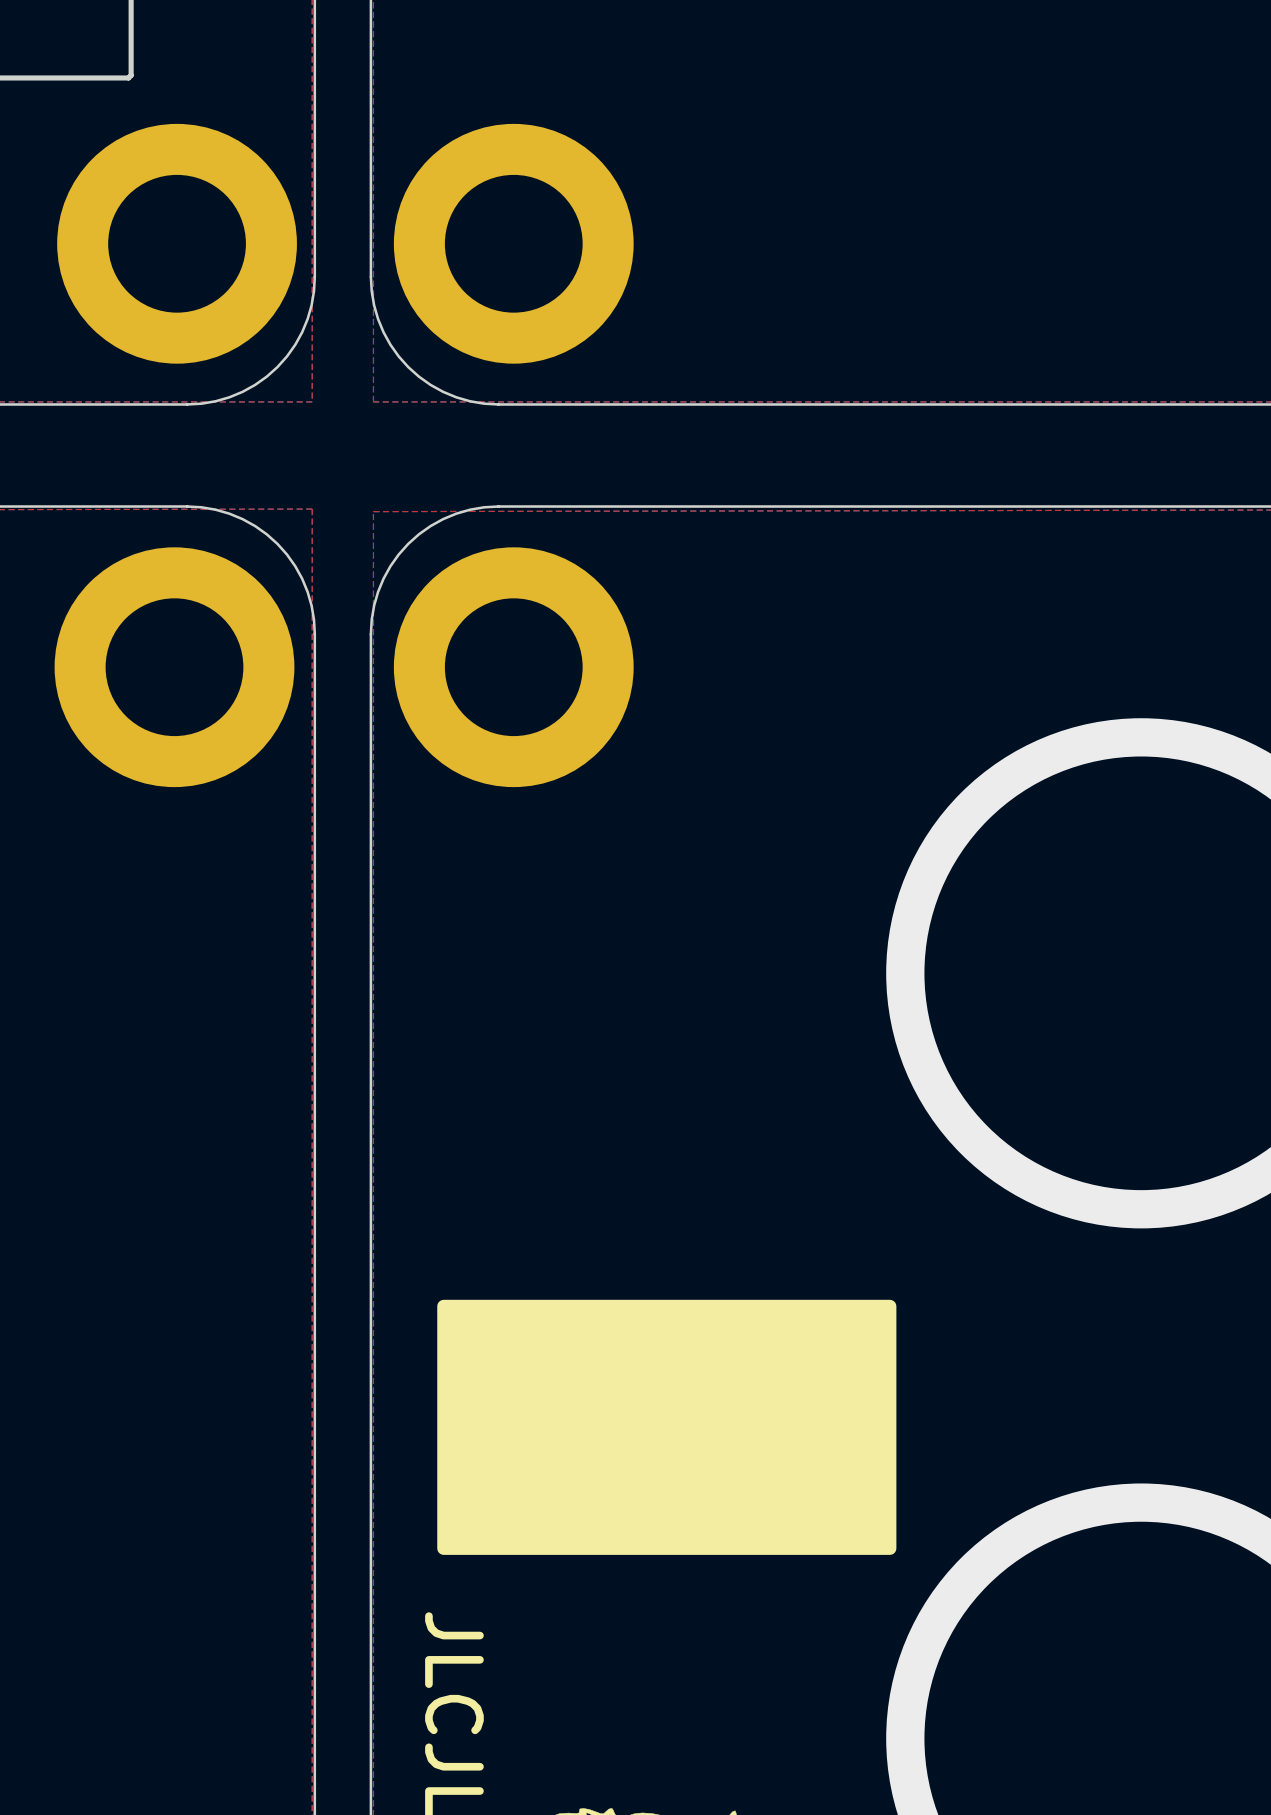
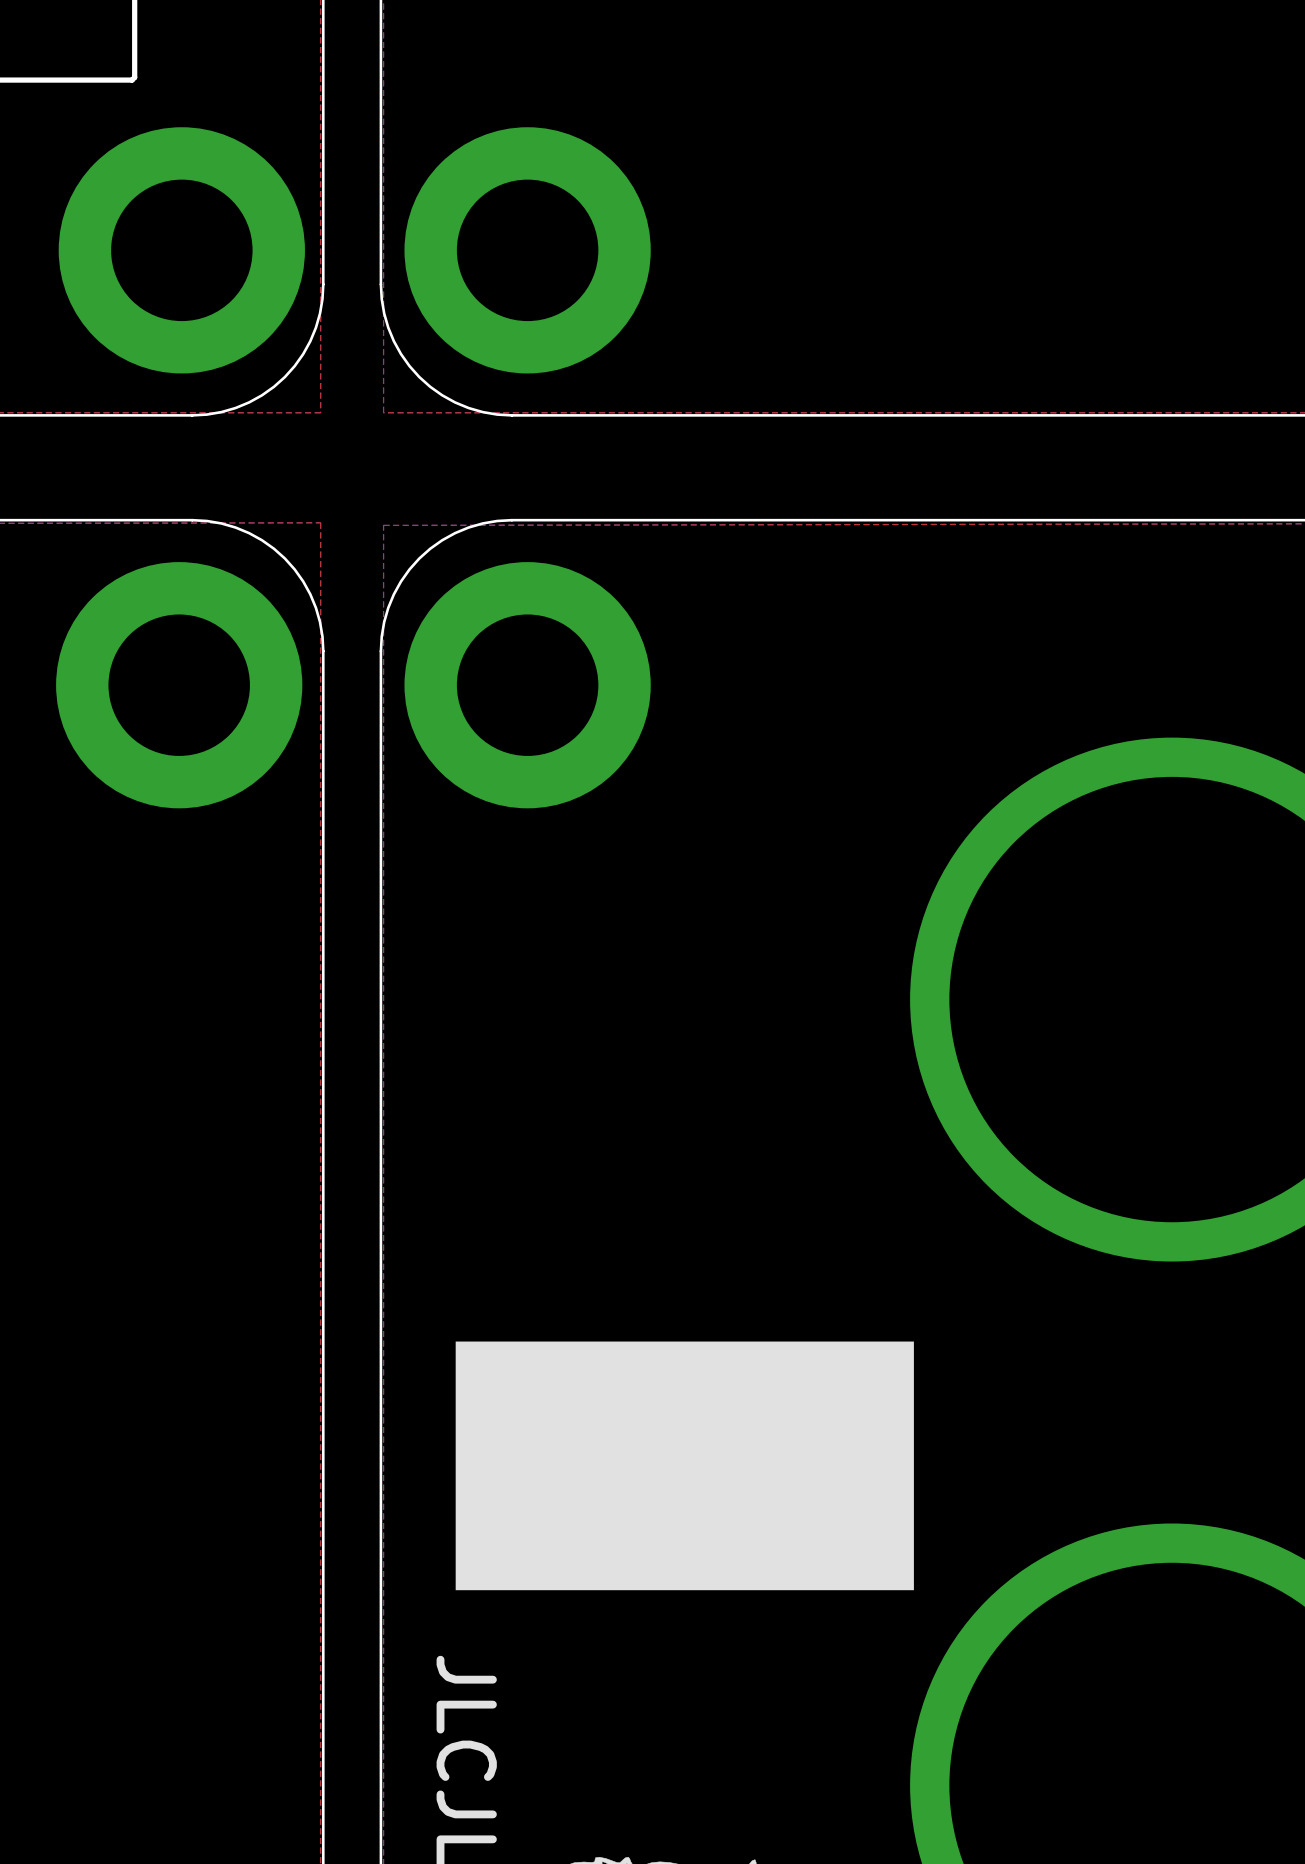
drawing shape: [437, 1299, 897, 1555] -> [455, 1341, 914, 1591]

